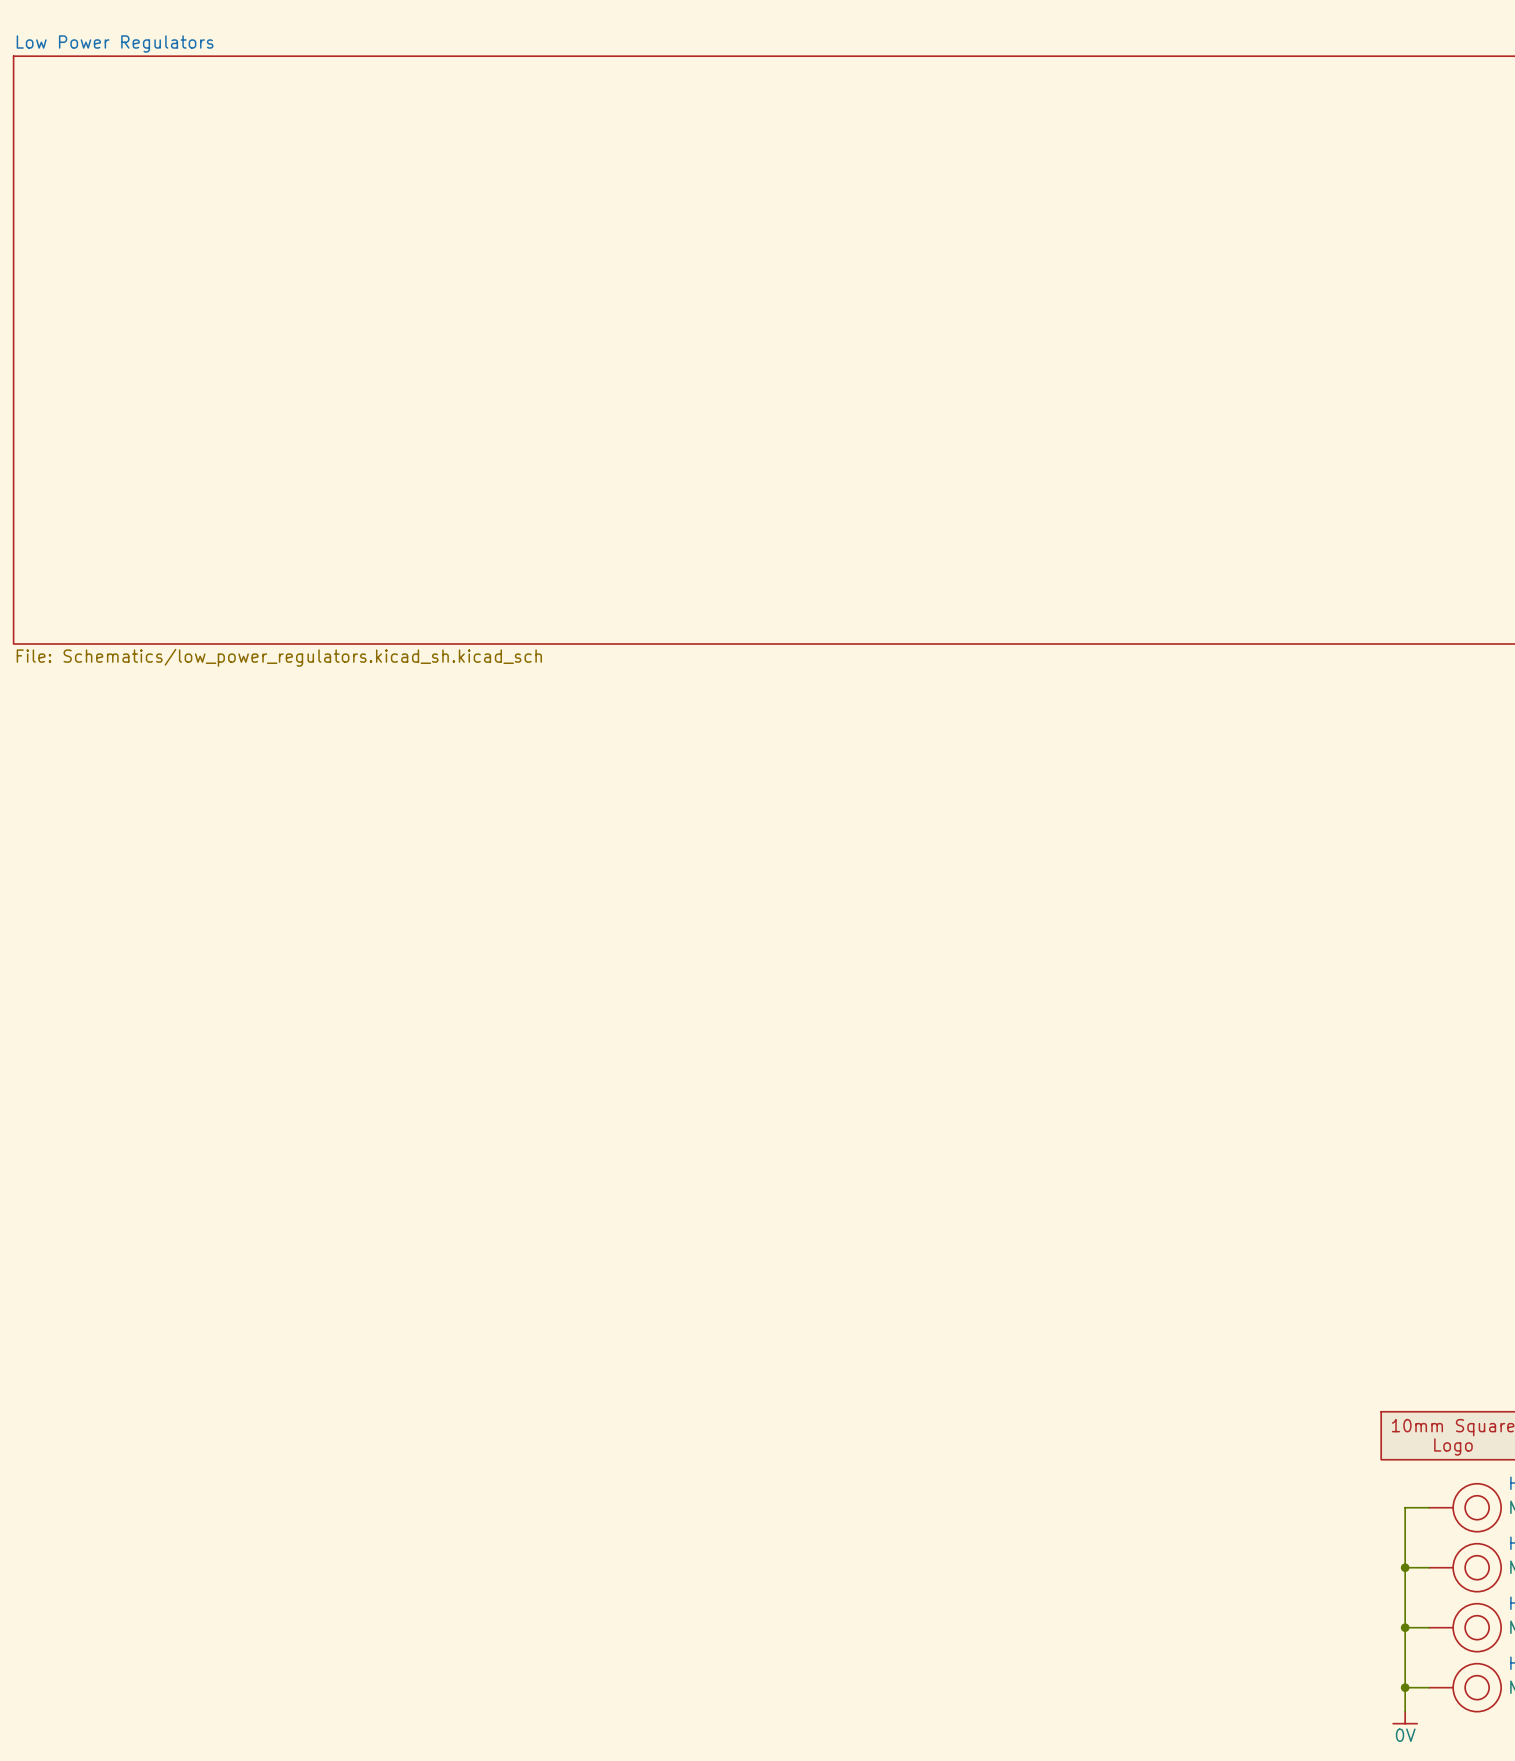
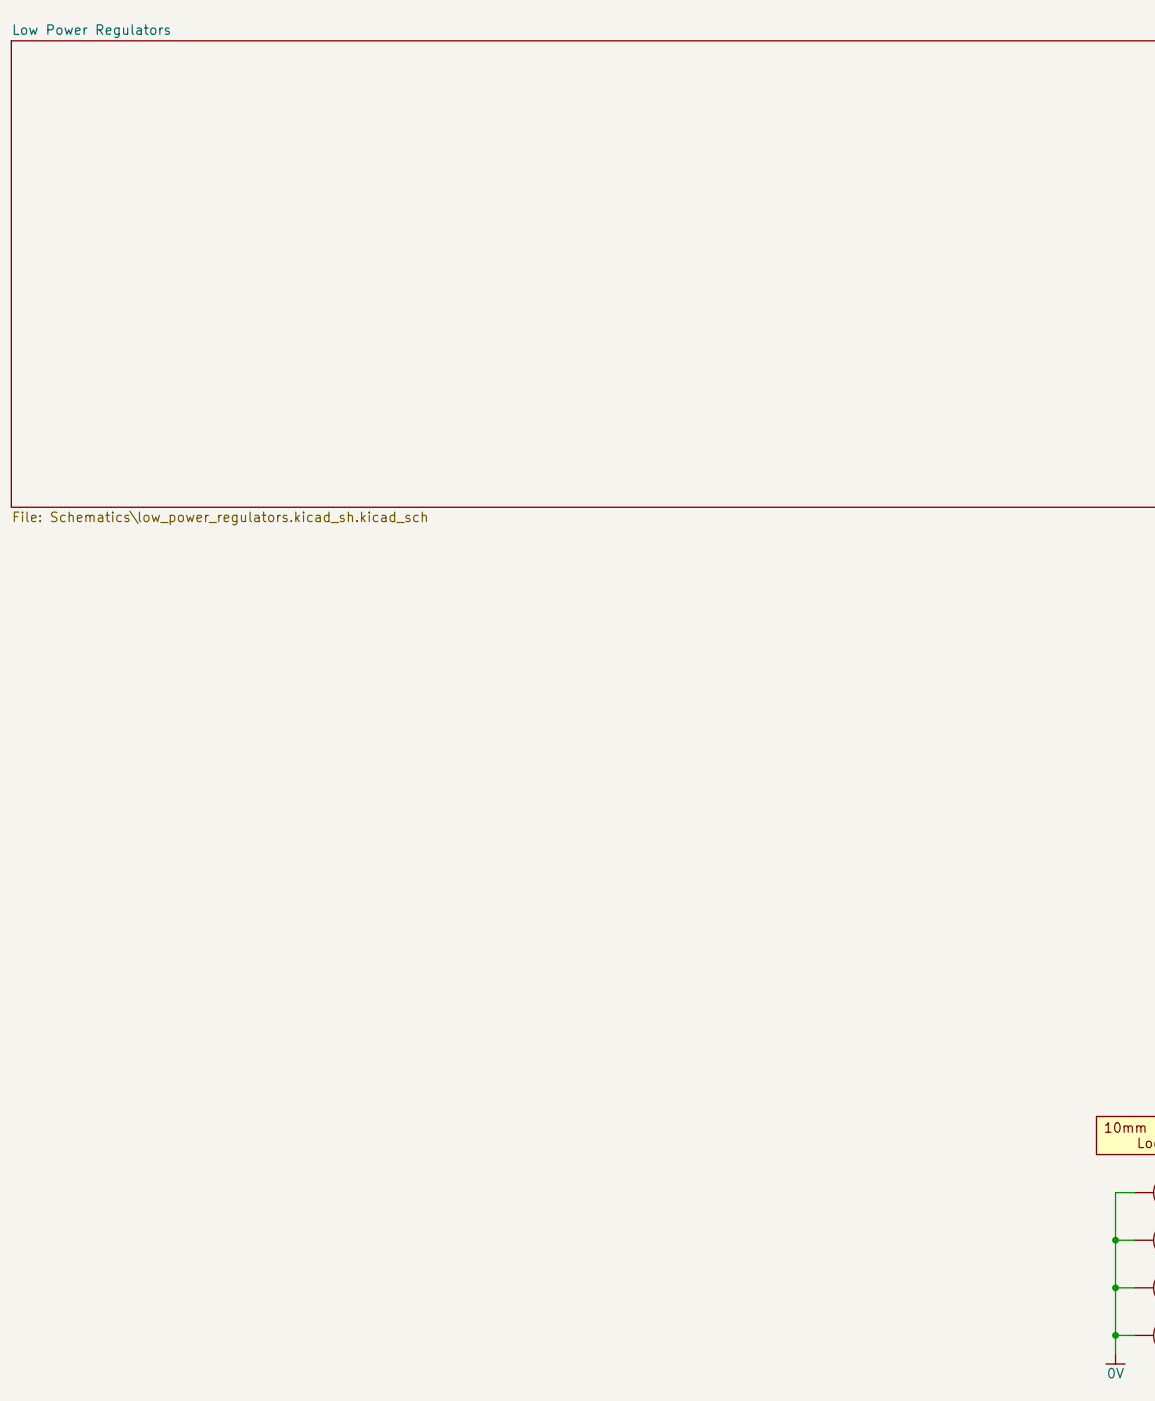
sheet Low Power Regulators value: File: Schematics/low_power_regulators.kicad_sh.kicad_sch (279, 657) -> File: Schematics\low_power_regulators.kicad_sh.kicad_sch (220, 517)

